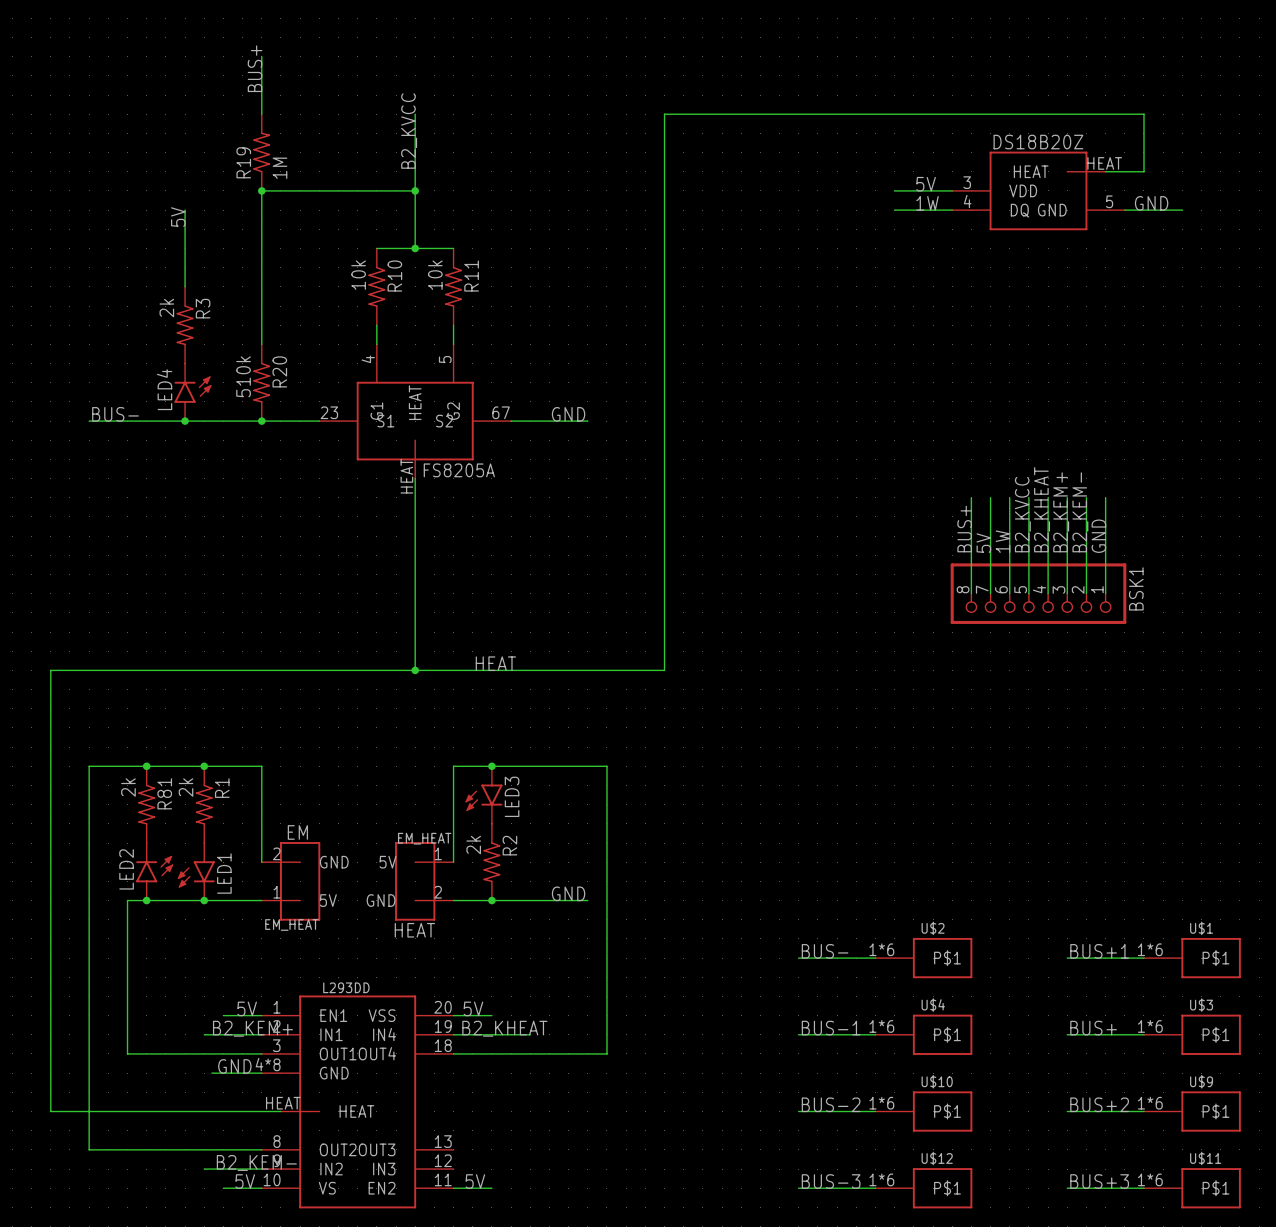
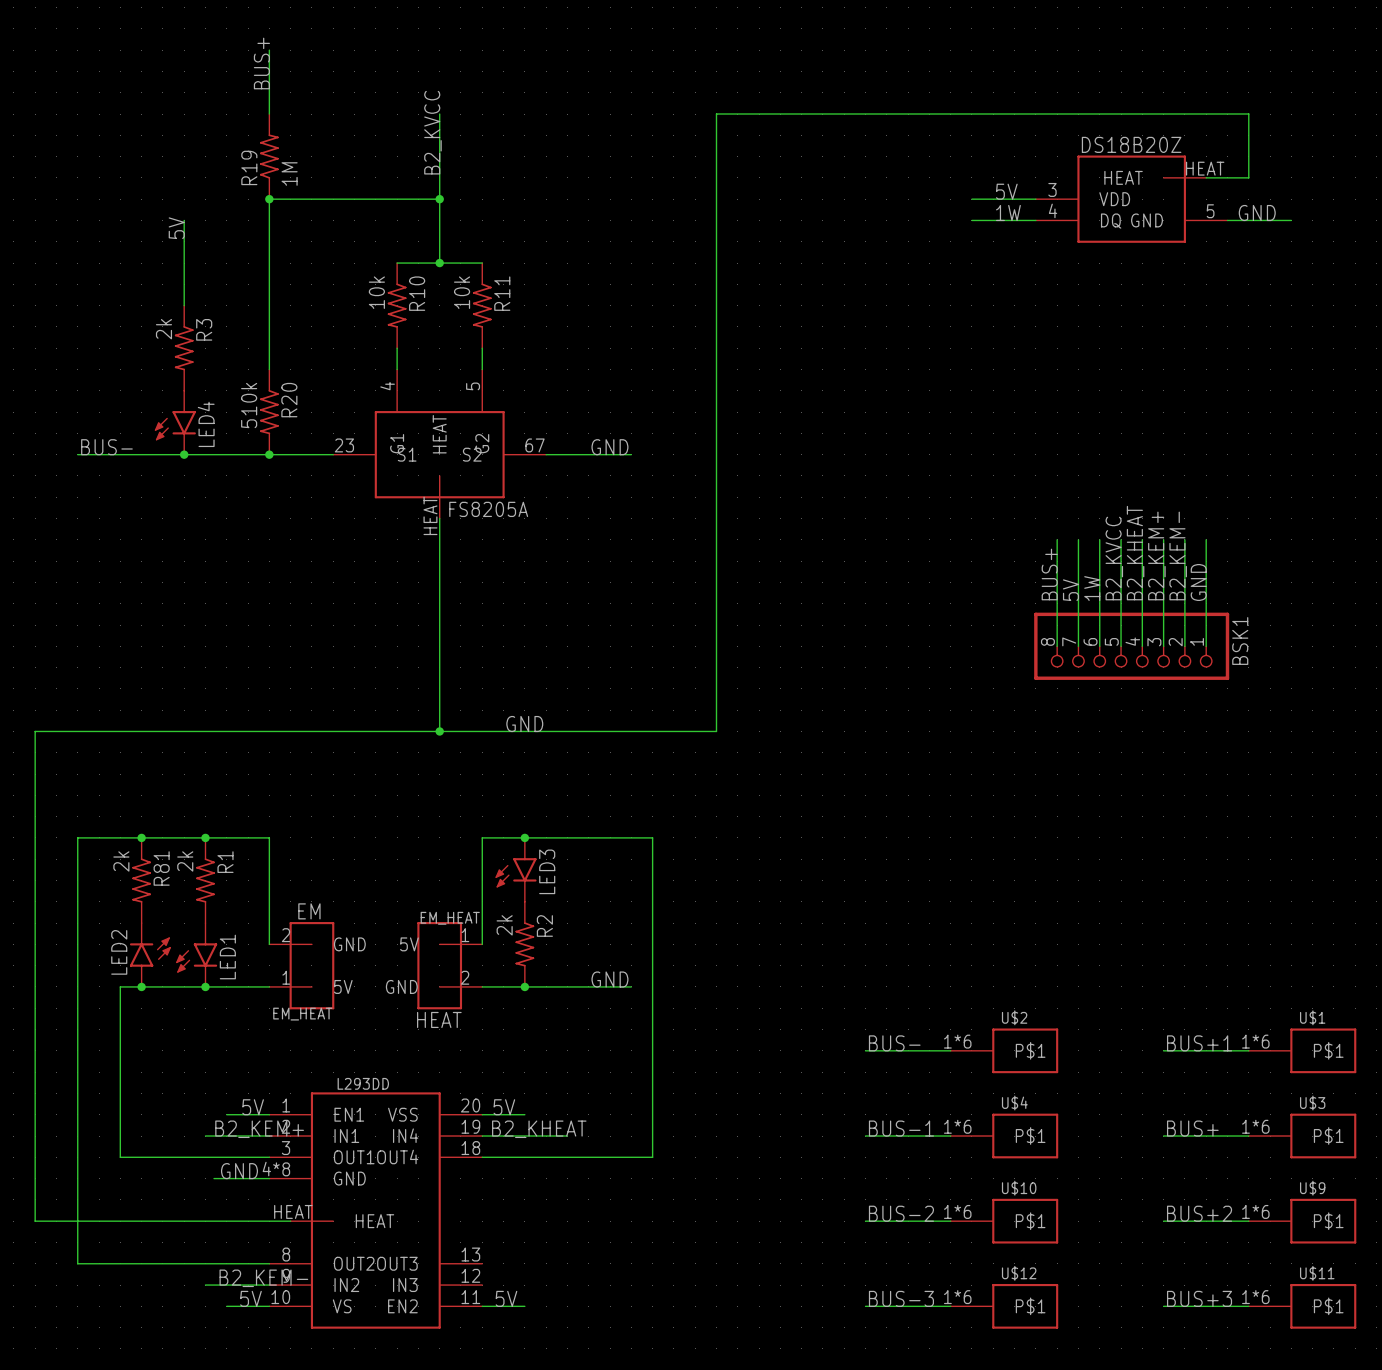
LED4 rotation: 0° (193, 389) -> 180° (175, 425)
label: HEAT (495, 663) -> GND (524, 724)

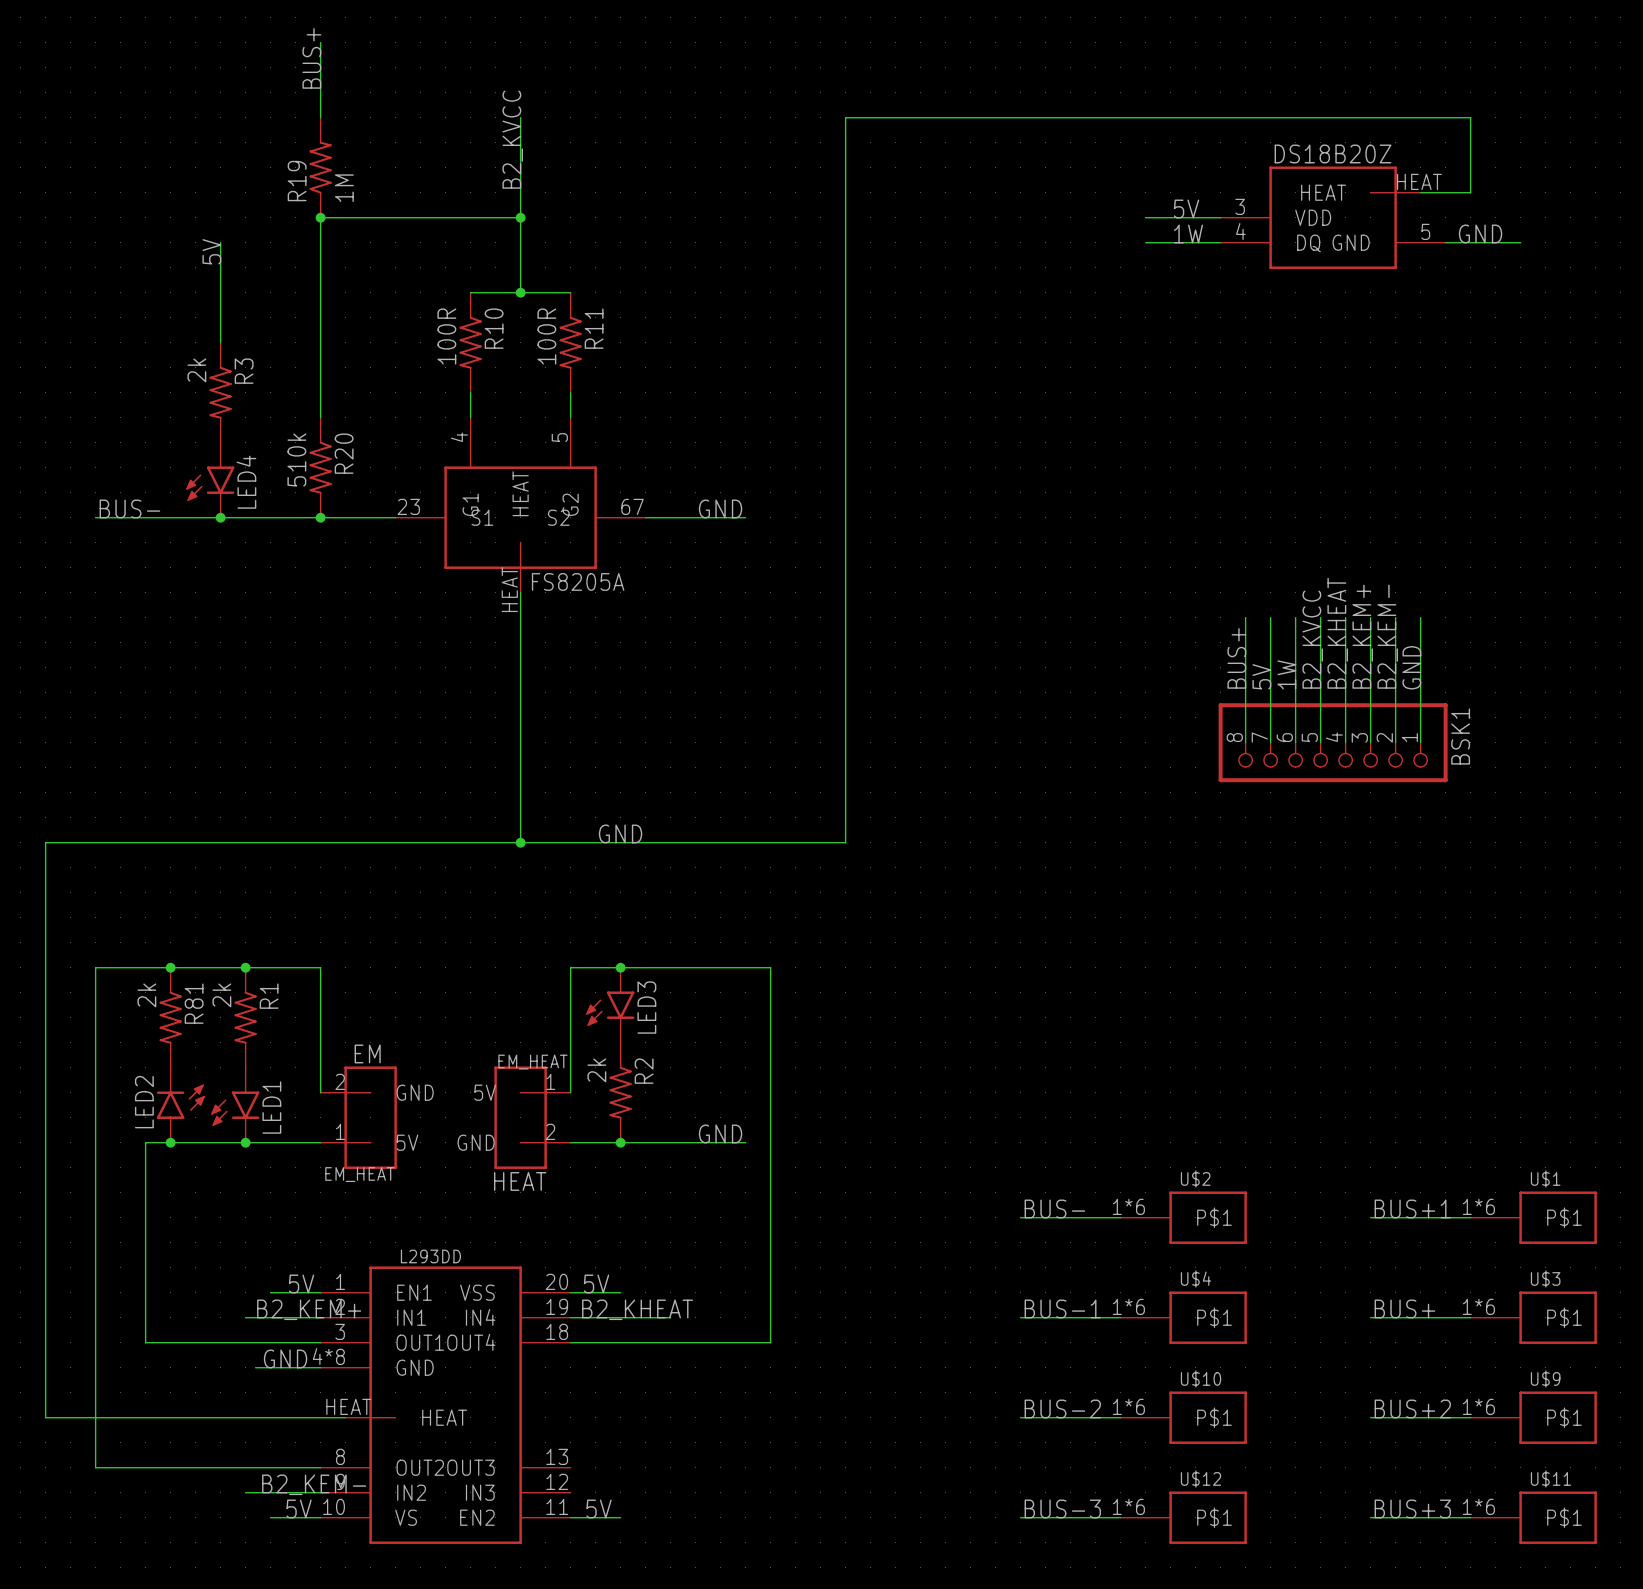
R10 value: 10k (376, 292) -> 100R (446, 336)
R11 value: 10k (462, 292) -> 100R (546, 336)

